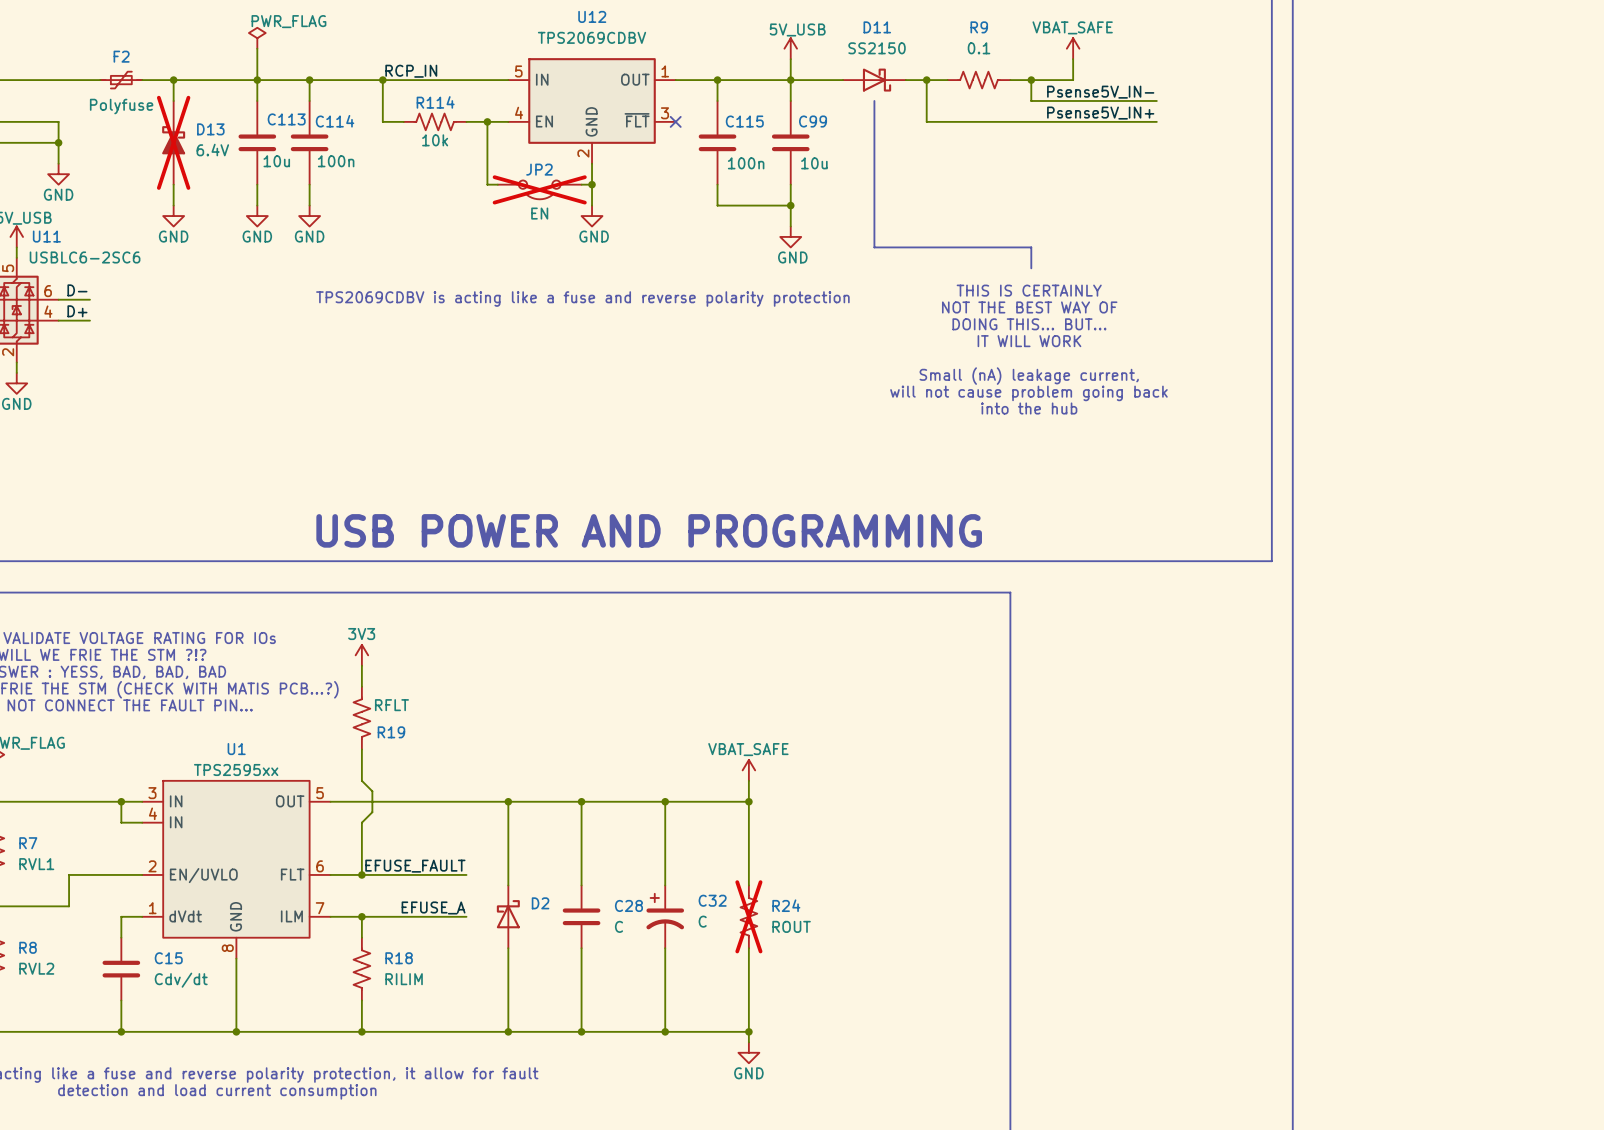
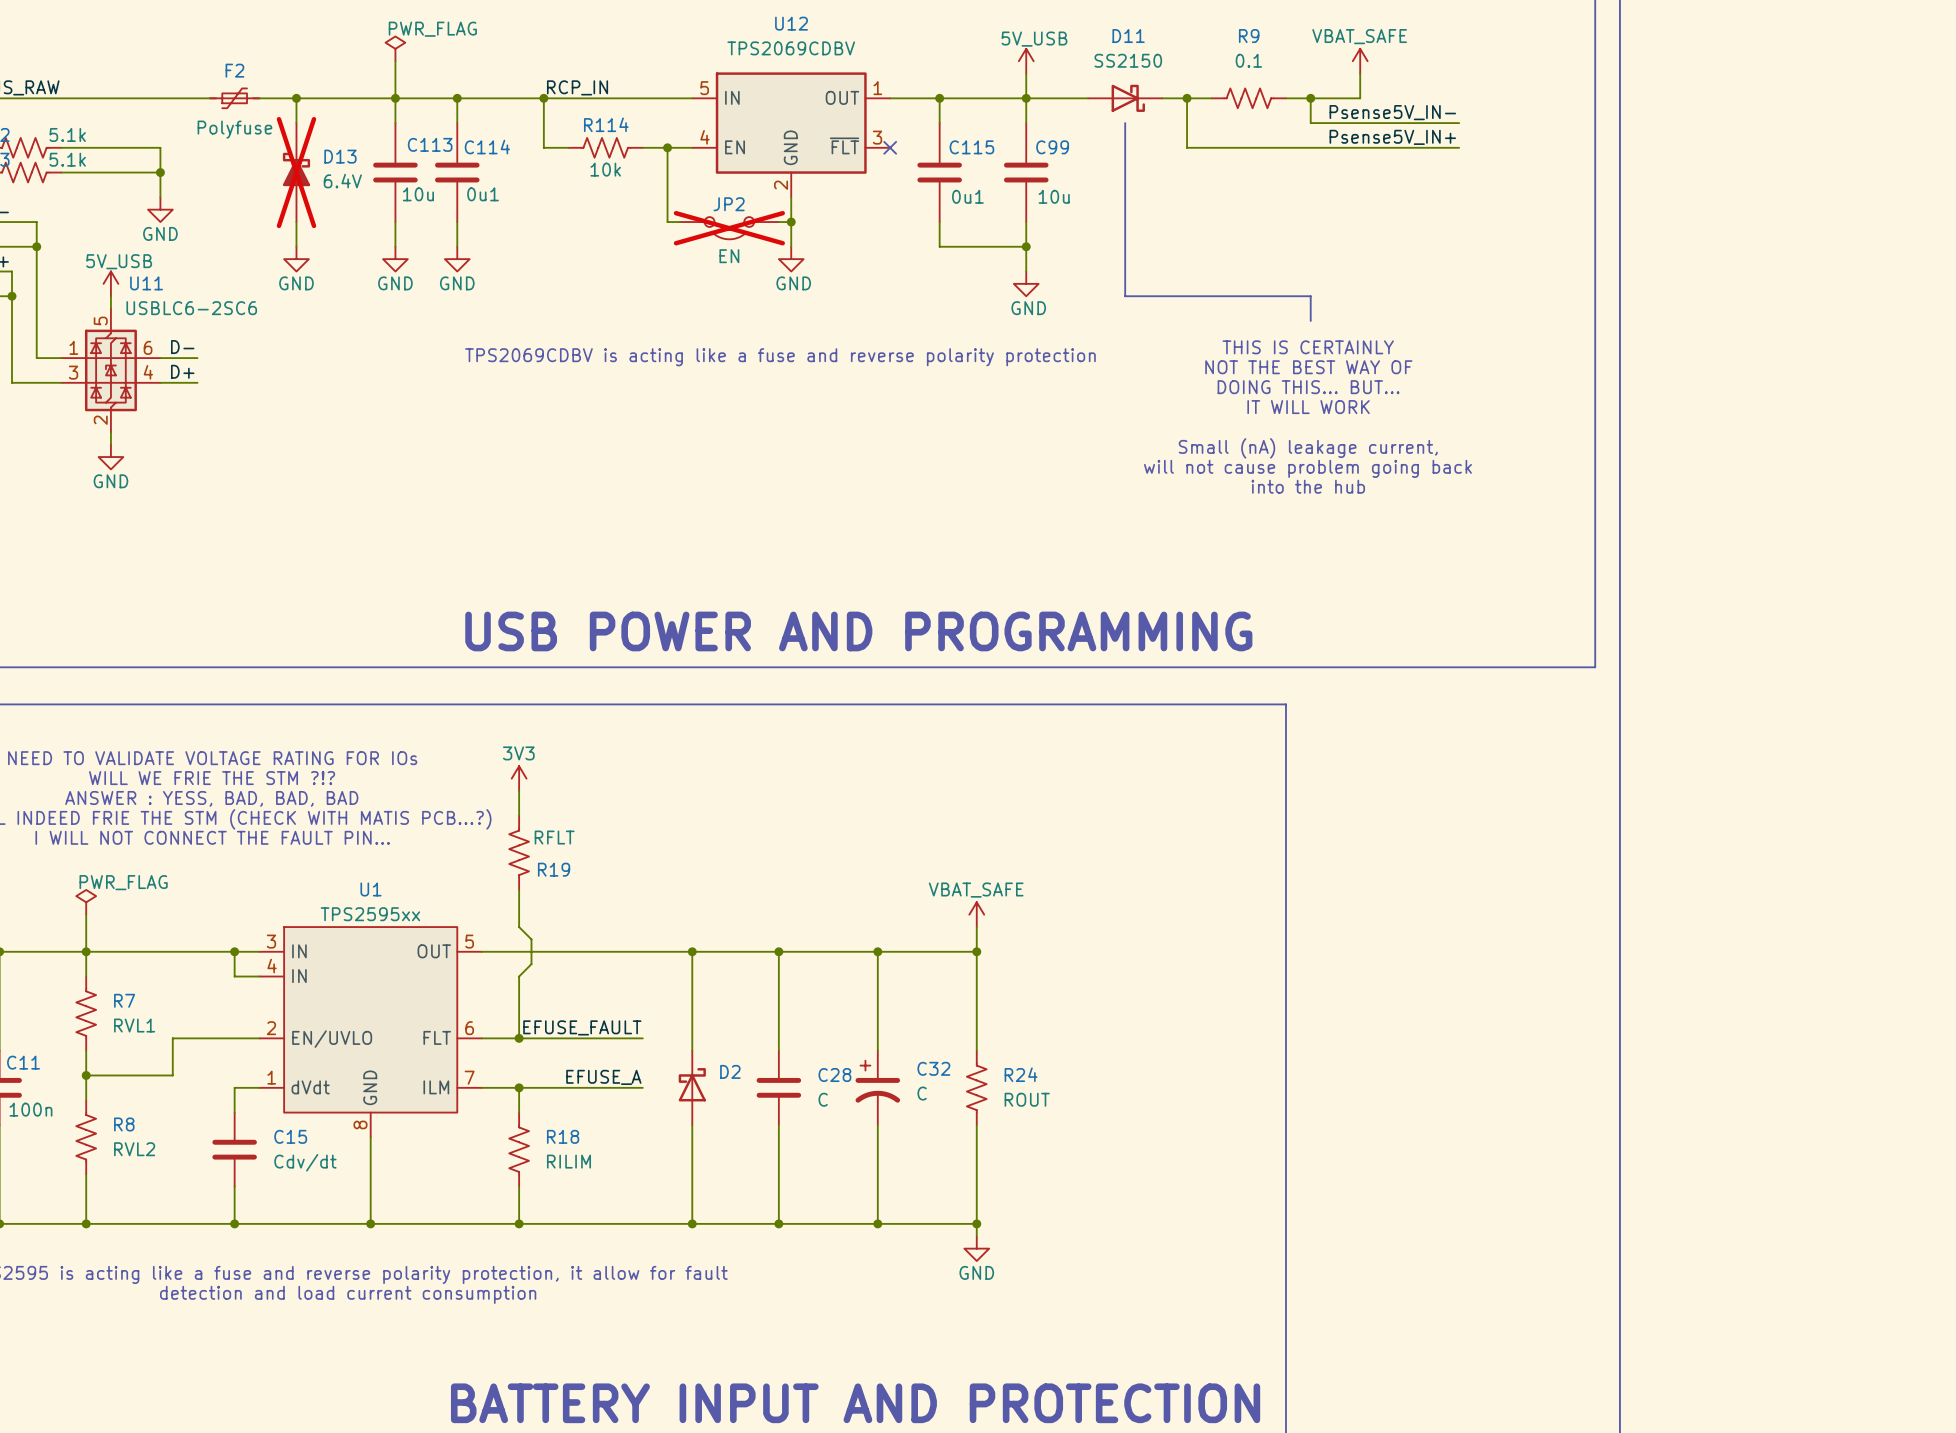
C114 value: 100n (336, 161) -> 0u1 (483, 194)
C115 value: 100n (746, 163) -> 0u1 (967, 196)
R24 do-not-place cross: (748, 916) -> none

